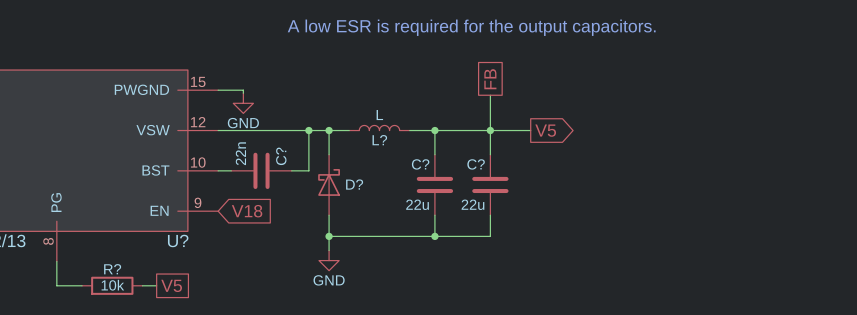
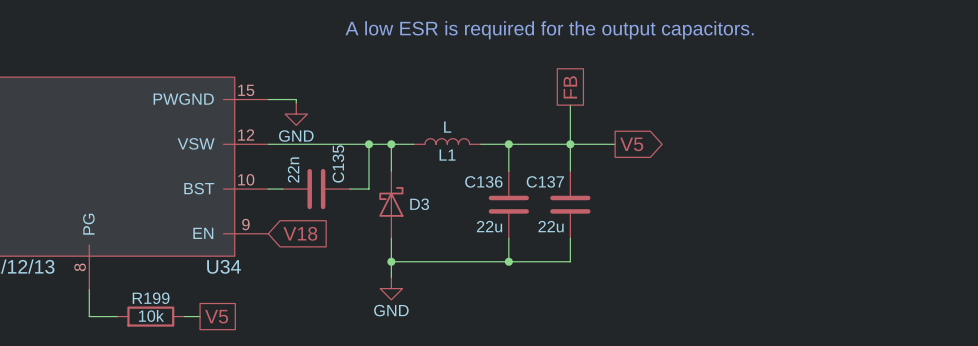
L? name: L? (379, 140) -> L1 (447, 155)
C? name: C? (281, 156) -> C135 (338, 163)
C? name: C? (420, 164) -> C136 (483, 181)
C? name: C? (476, 164) -> C137 (545, 181)
D? name: D? (354, 184) -> D3 (419, 204)
U? name: U? (178, 240) -> U34 (224, 266)
R? name: R? (112, 269) -> R199 (151, 298)

